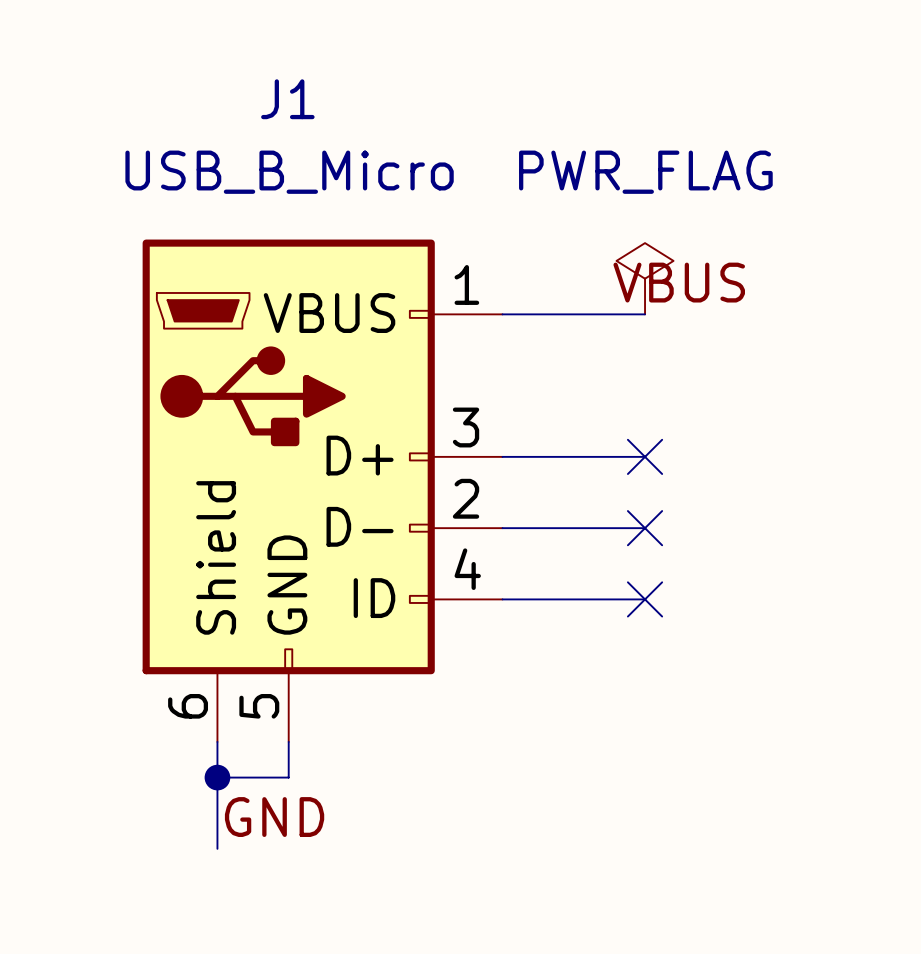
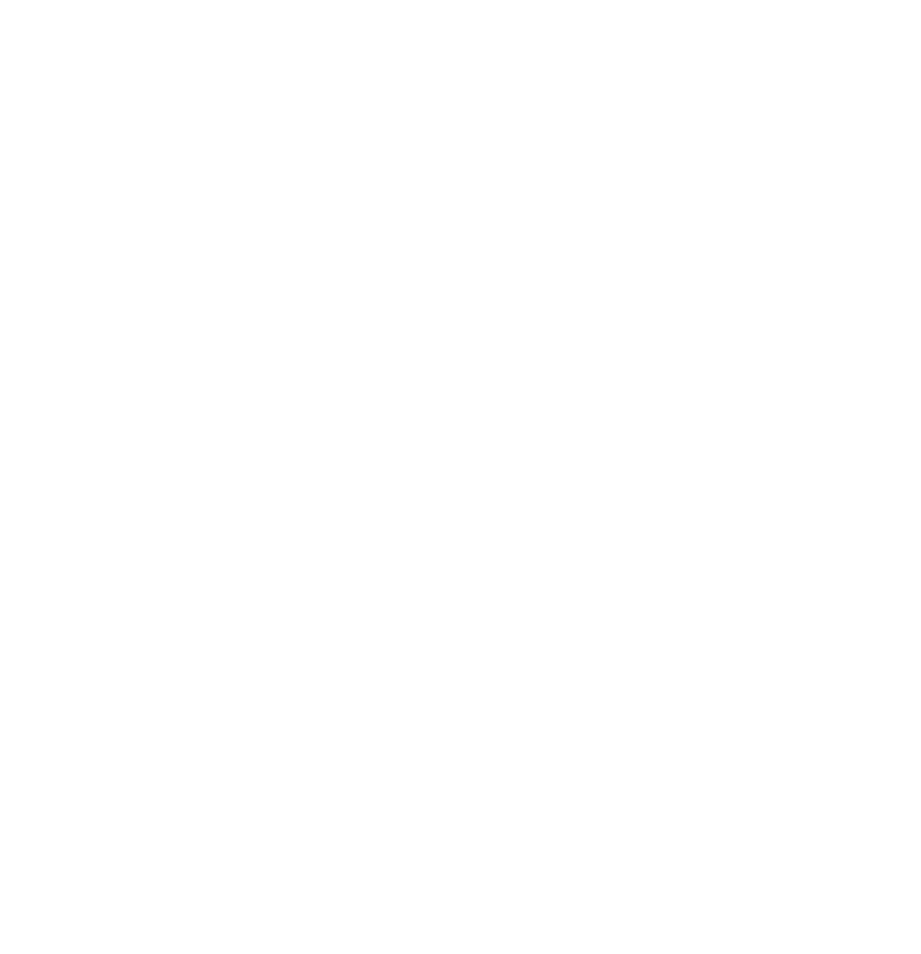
power symbol: PWR_FLAG (645, 278) -> none
label: VBUS (679, 282) -> none
wire: (502, 314) (645, 314) -> none
wire: (502, 456) (645, 456) -> none
no-connect mark: (645, 456) -> none
J1: USB_B_Micro (322, 490) -> none
wire: (502, 528) (645, 528) -> none
no-connect mark: (645, 528) -> none
wire: (502, 599) (645, 599) -> none
no-connect mark: (645, 599) -> none
wire: (217, 741) (217, 848) -> none
wire: (288, 741) (288, 777) (217, 777) -> none
junction: (217, 777) -> none
label: GND (274, 817) -> none

